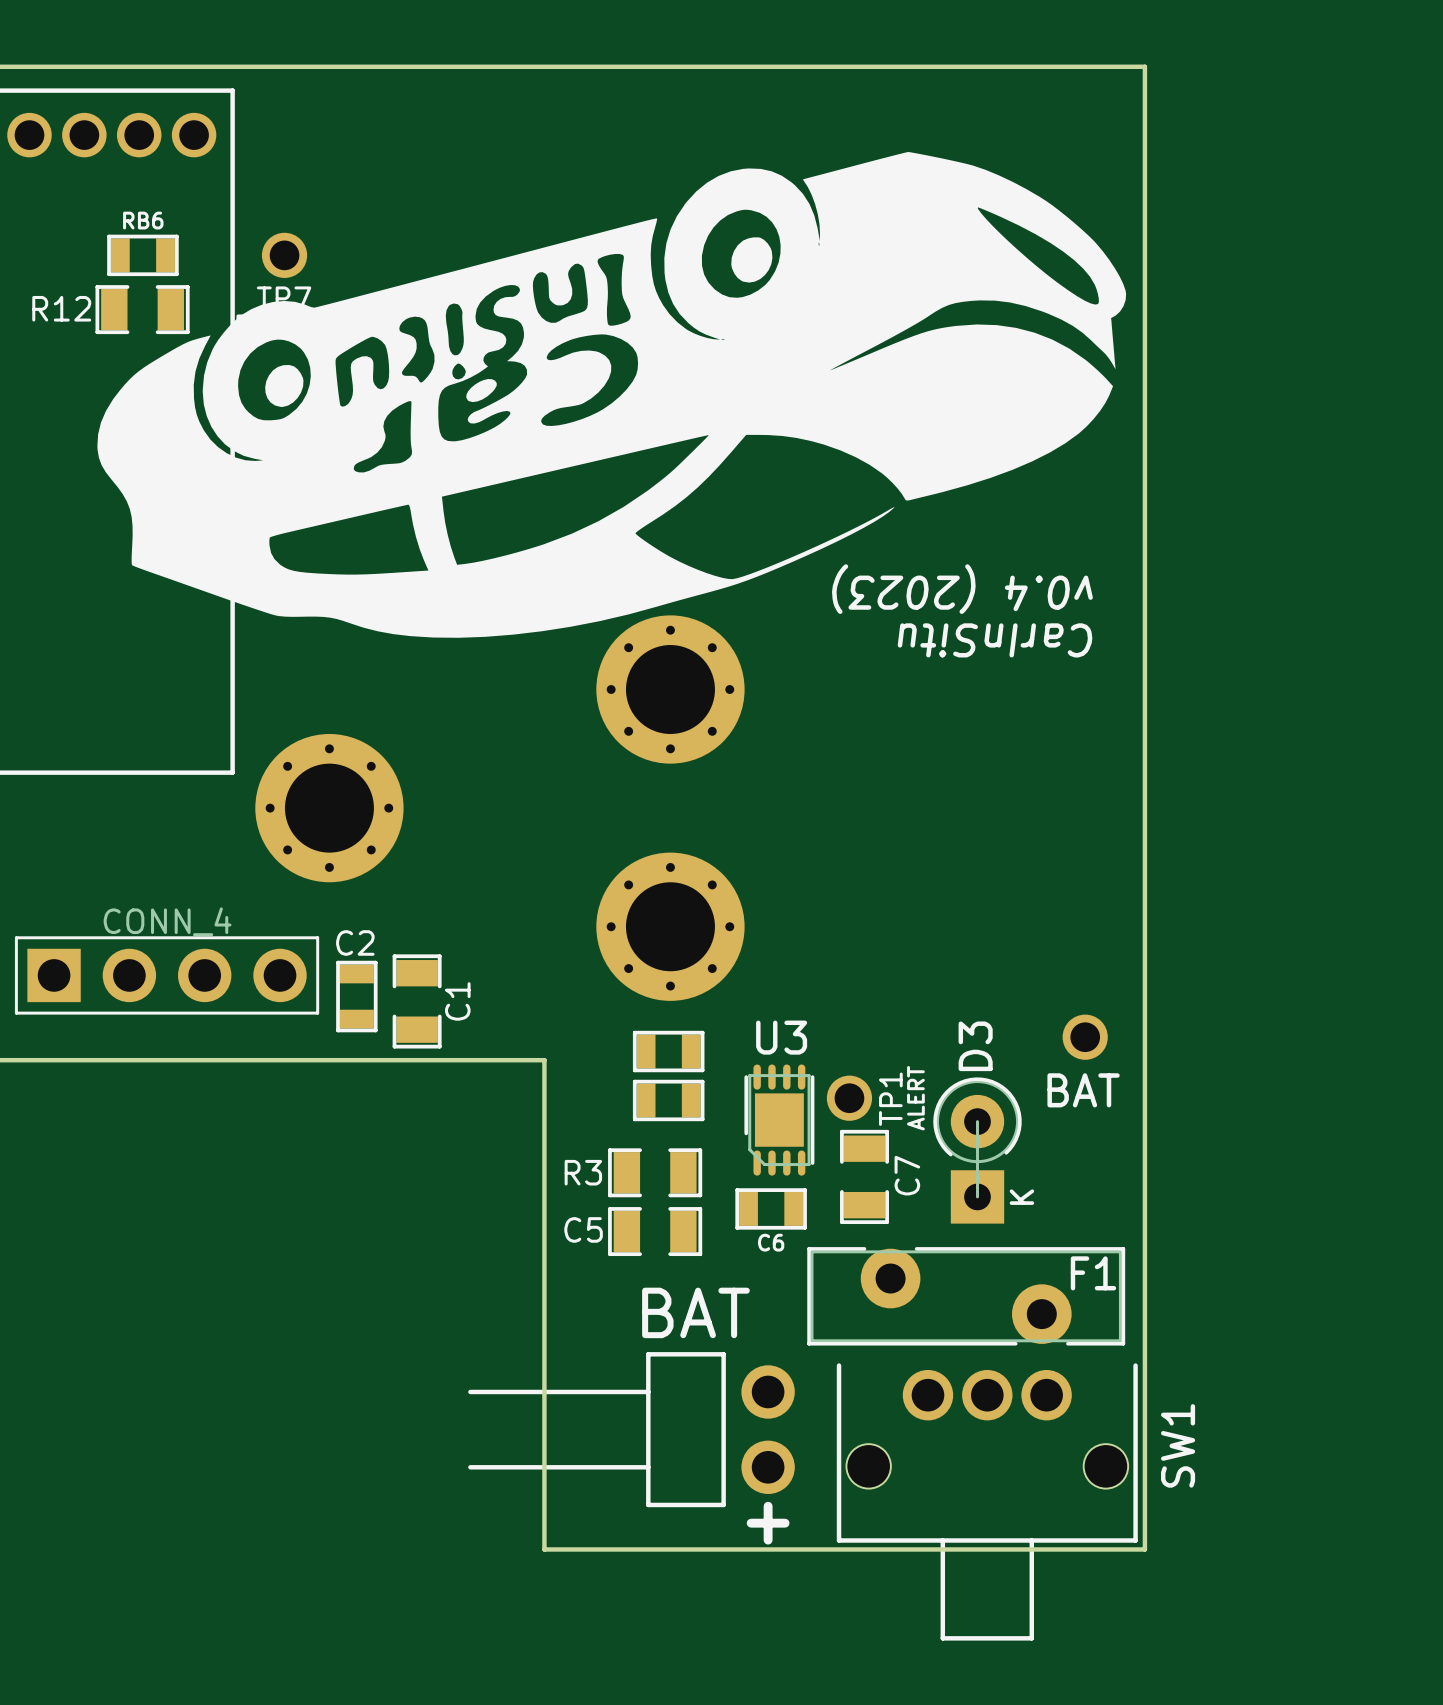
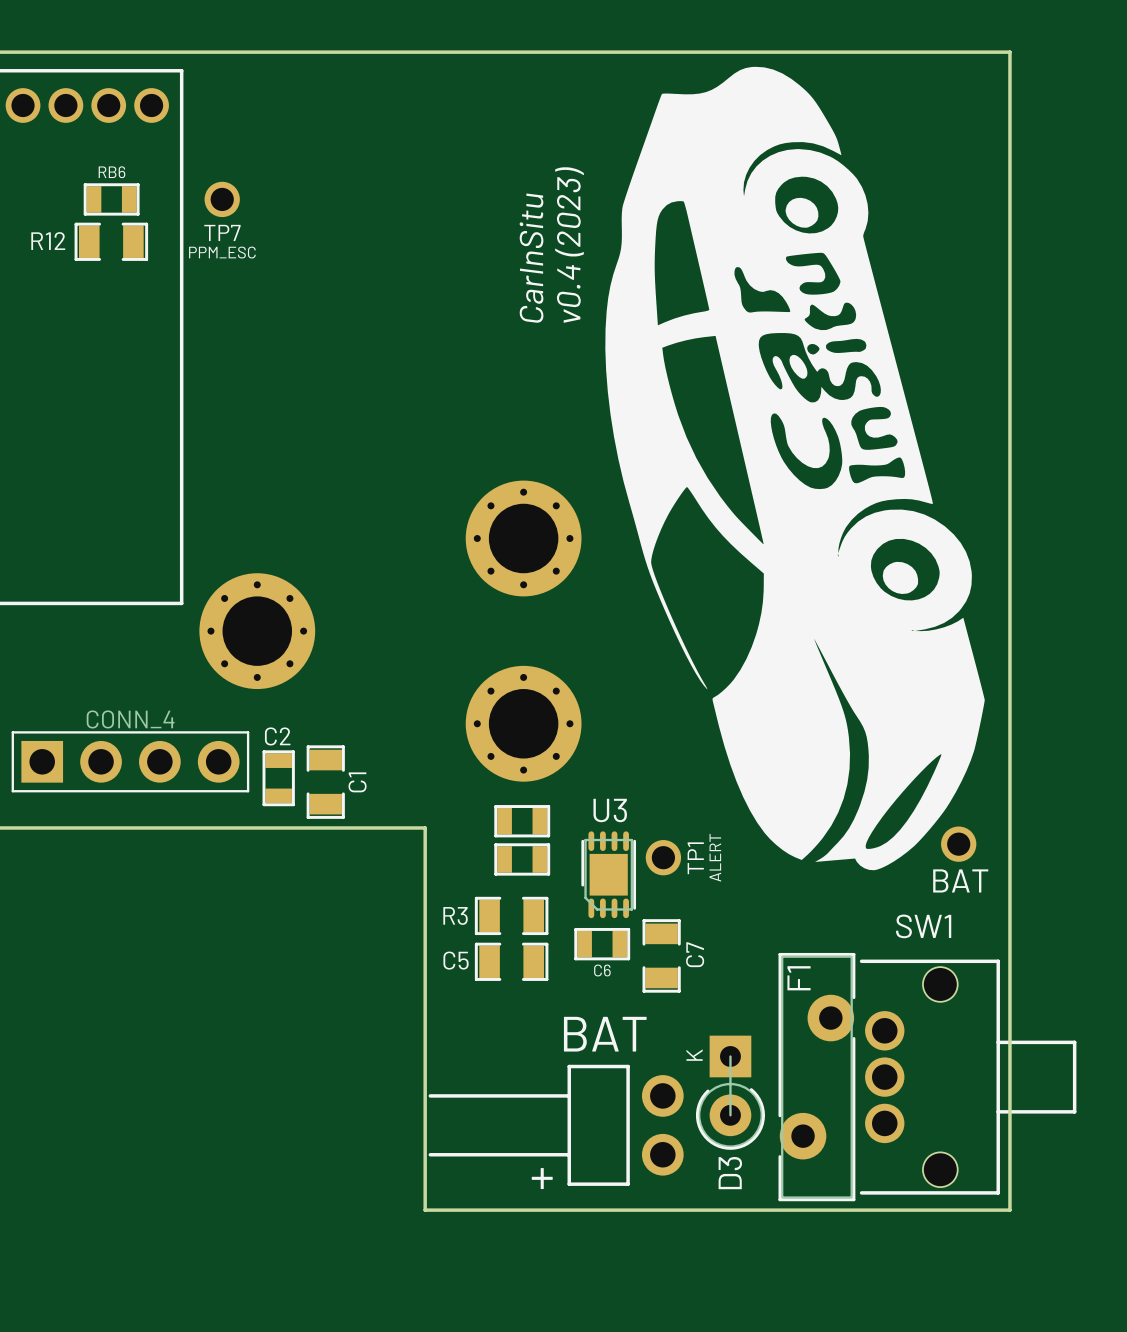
board edge: (1144, 66) (1144, 1549) -> (894, 52) (1009, 52) (1009, 1210) (894, 1210)
drawing: none -> [605, 66, 985, 871]
drawing: [97, 151, 1127, 638] -> none
text rotation: 0° (962, 589) -> 90° clockwise (569, 244)
text position: v0.4 (2023) (962, 589) -> v0.4 (2023) (569, 244)
text rotation: 0° (995, 640) -> 90° clockwise (531, 258)
text position: CarInSitu (995, 640) -> CarInSitu (531, 258)
part position: (1085, 1037) -> (958, 844)
text position: BAT (1083, 1090) -> BAT (960, 880)
D3 rotation: 0° (977, 1150) -> 180° (730, 1092)
D3 position: (977, 1150) -> (730, 1092)
C7 position: (864, 1176) -> (661, 955)
F1 name position: F1 (1093, 1273) -> F1 (799, 978)
F1 rotation: 0° (966, 1296) -> 90° clockwise (816, 1077)
part position: (631, 1429) -> (556, 1125)
SW1 rotation: 0° (987, 1501) -> 90° counterclockwise (968, 1077)
SW1 position: (987, 1501) -> (968, 1077)
text position: + (768, 1523) -> + (542, 1178)

